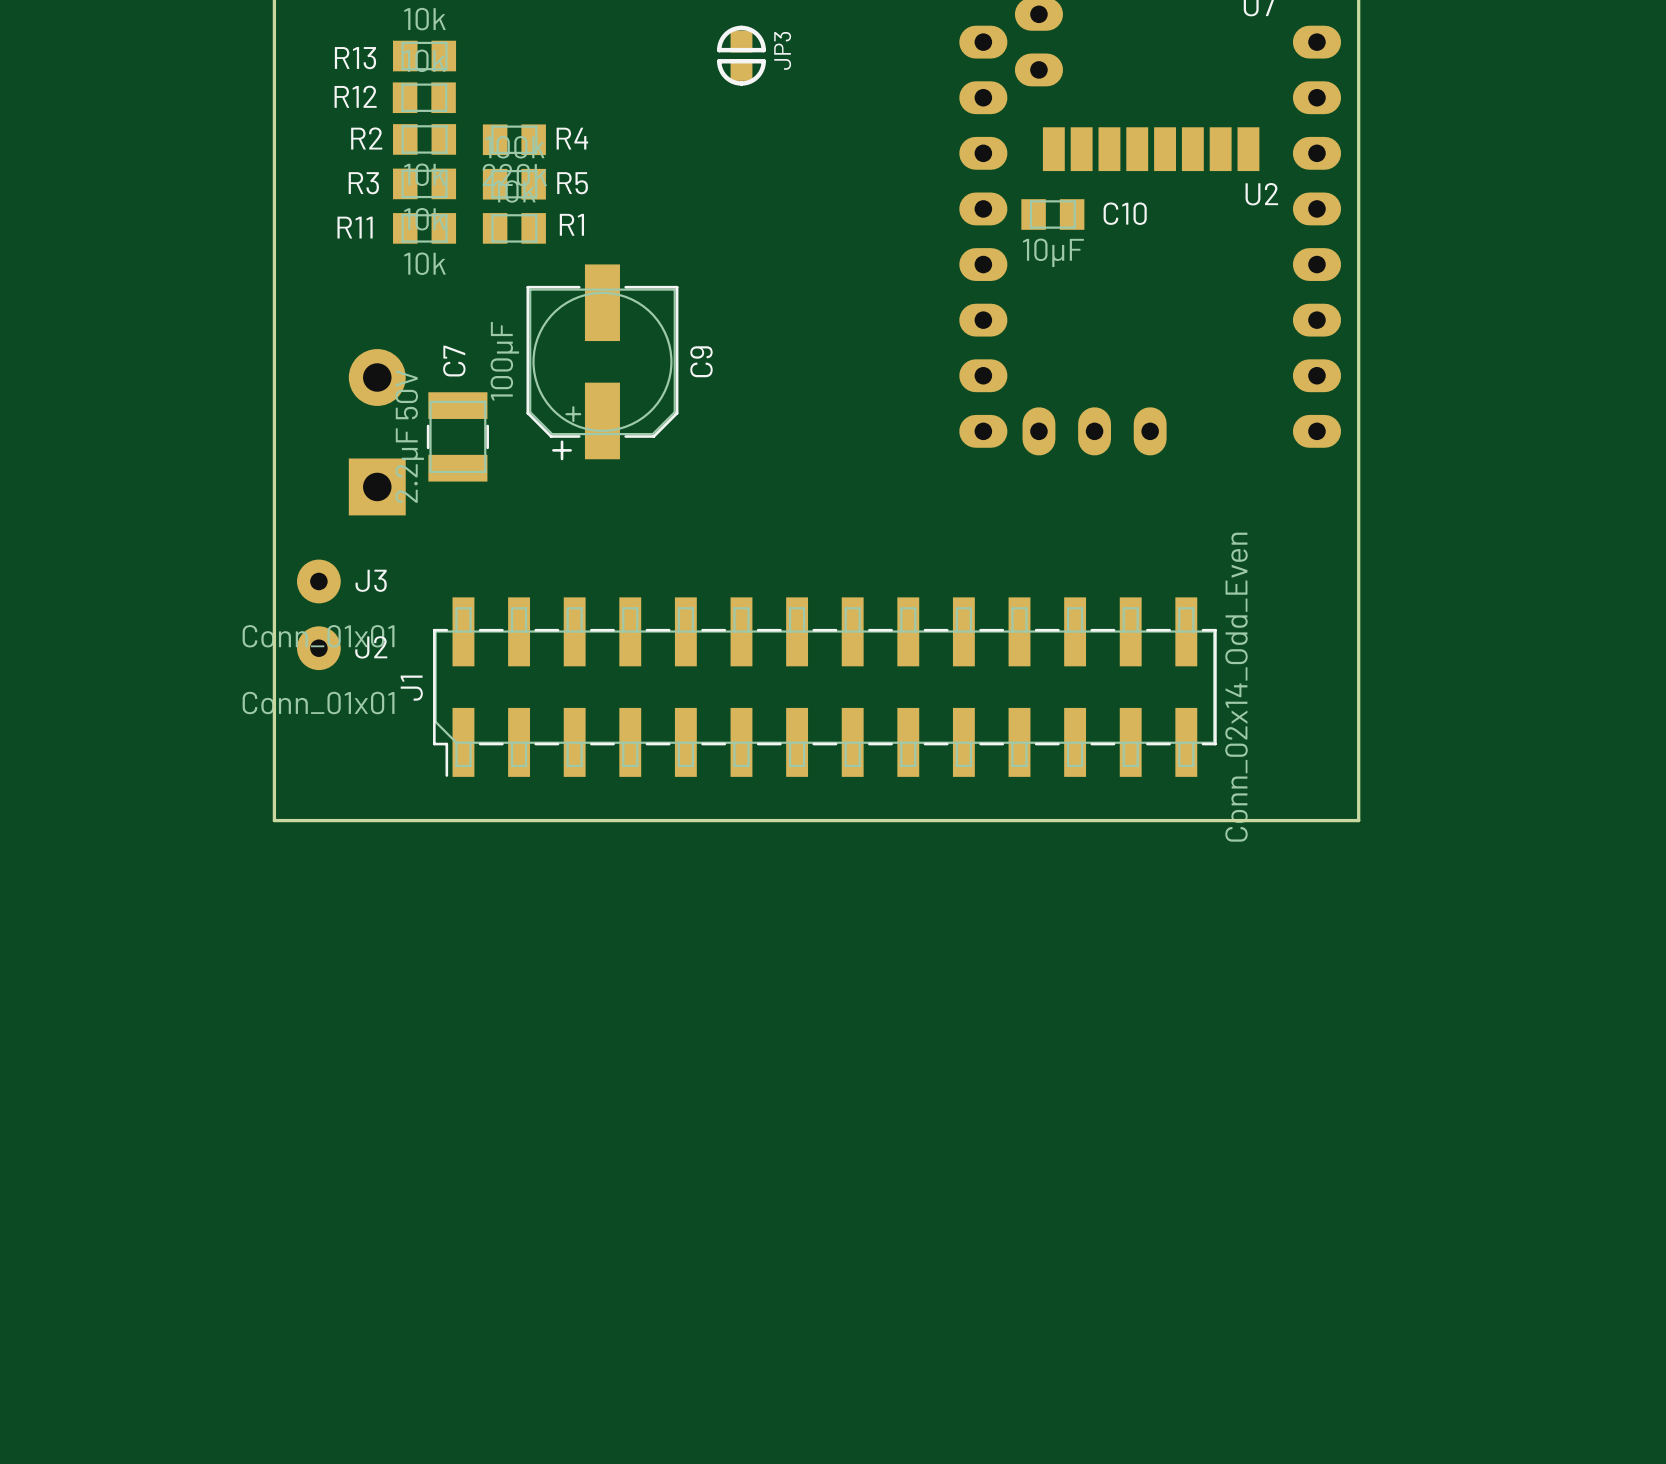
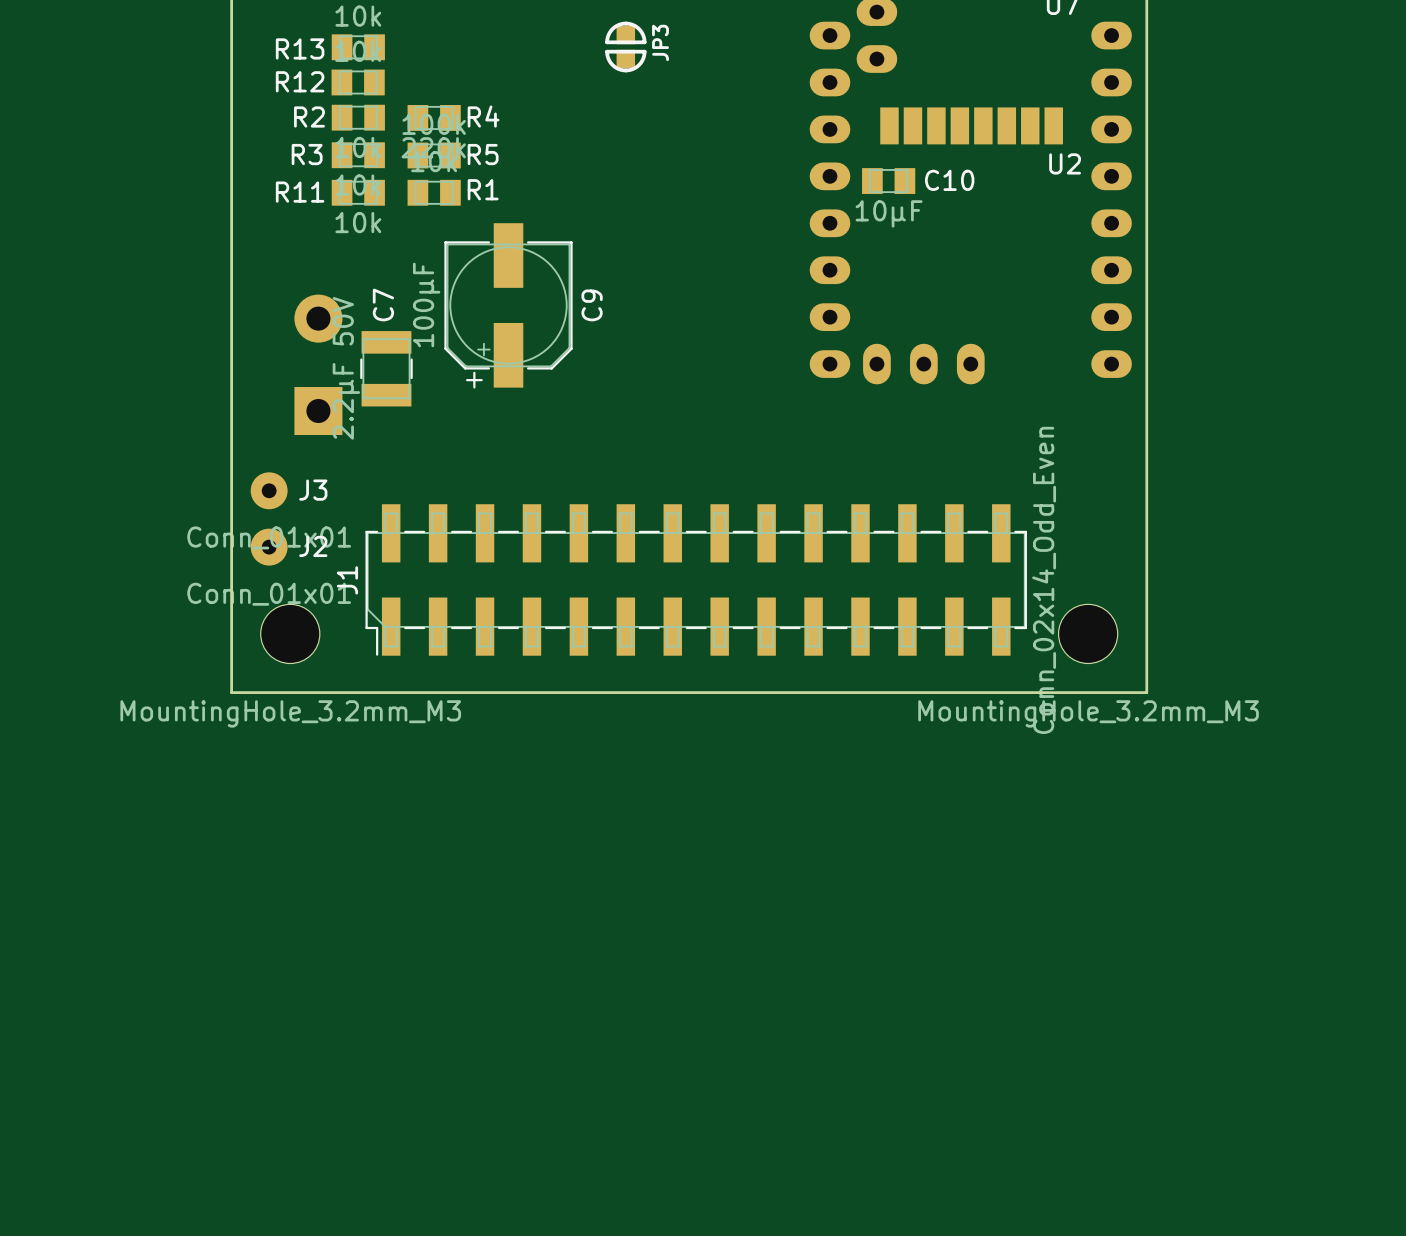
part: none -> MountingHole_3.2mm_M3 (290, 633)
part: none -> MountingHole_3.2mm_M3 (1088, 633)

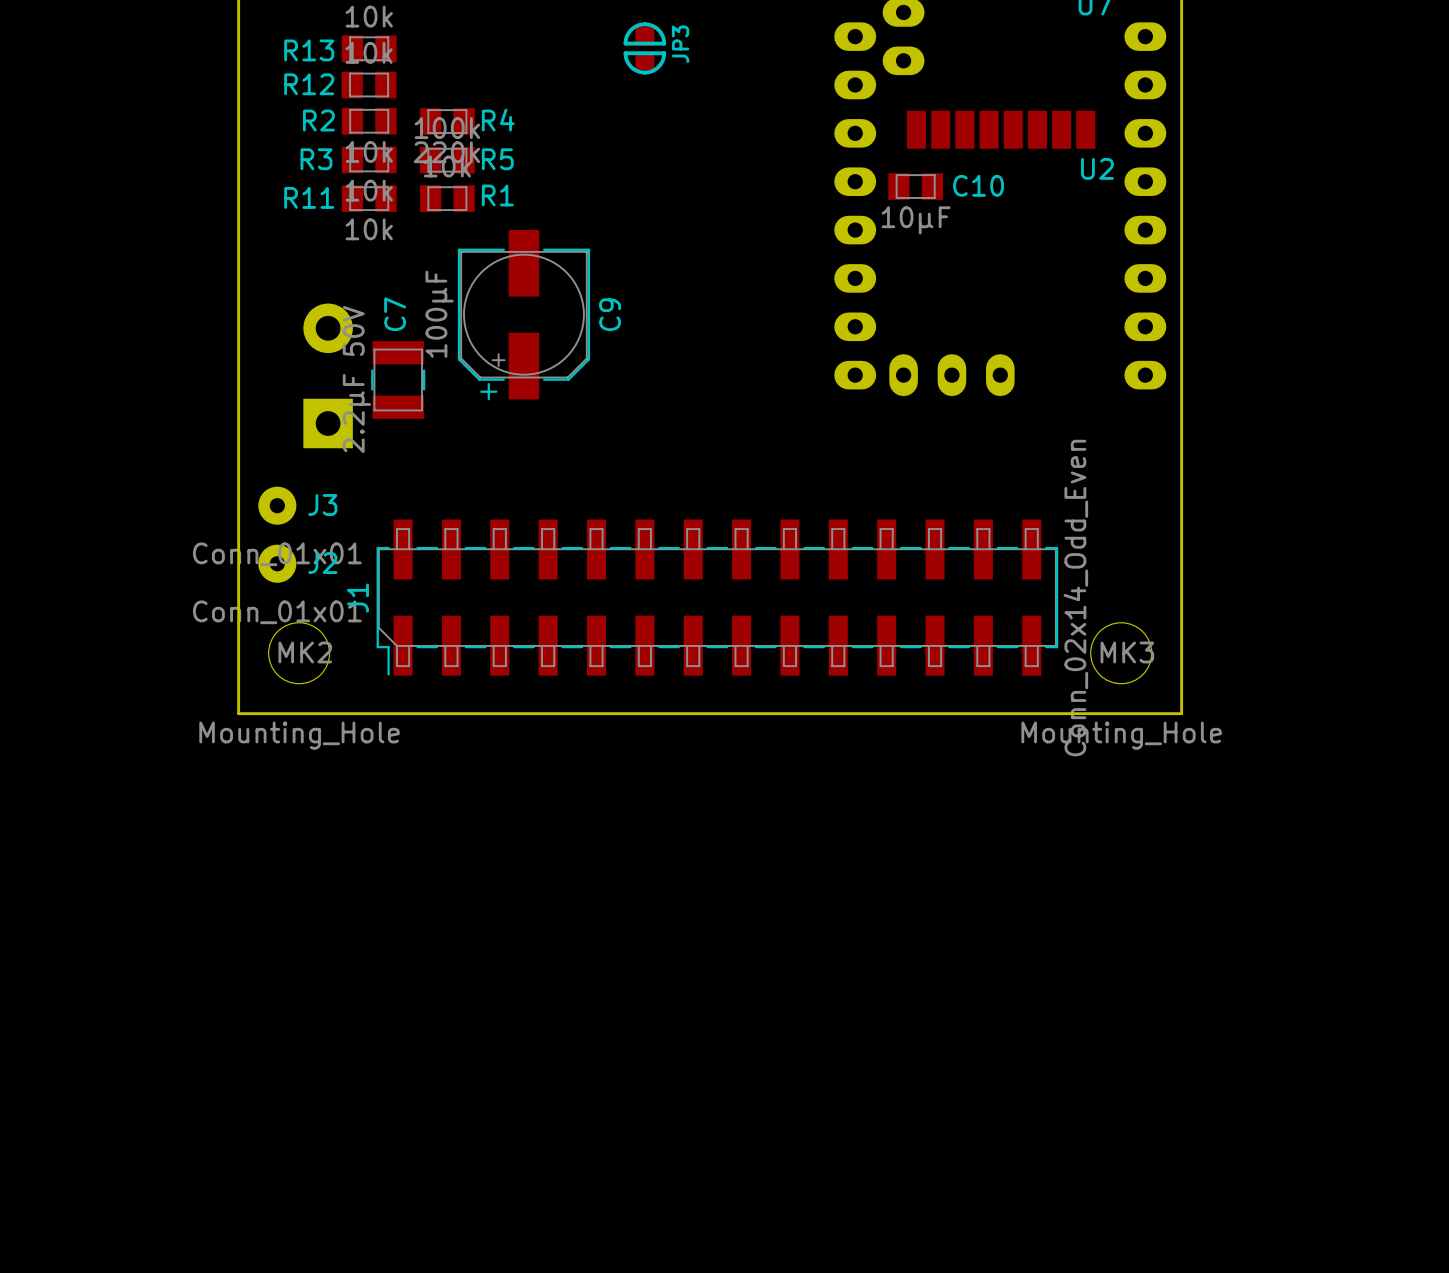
MK2 name: none -> MK2 (305, 652)
MK3 name: none -> MK3 (1127, 652)
MK2 value: MountingHole_3.2mm_M3 (290, 713) -> Mounting_Hole (299, 735)
MK3 value: MountingHole_3.2mm_M3 (1088, 713) -> Mounting_Hole (1121, 735)

